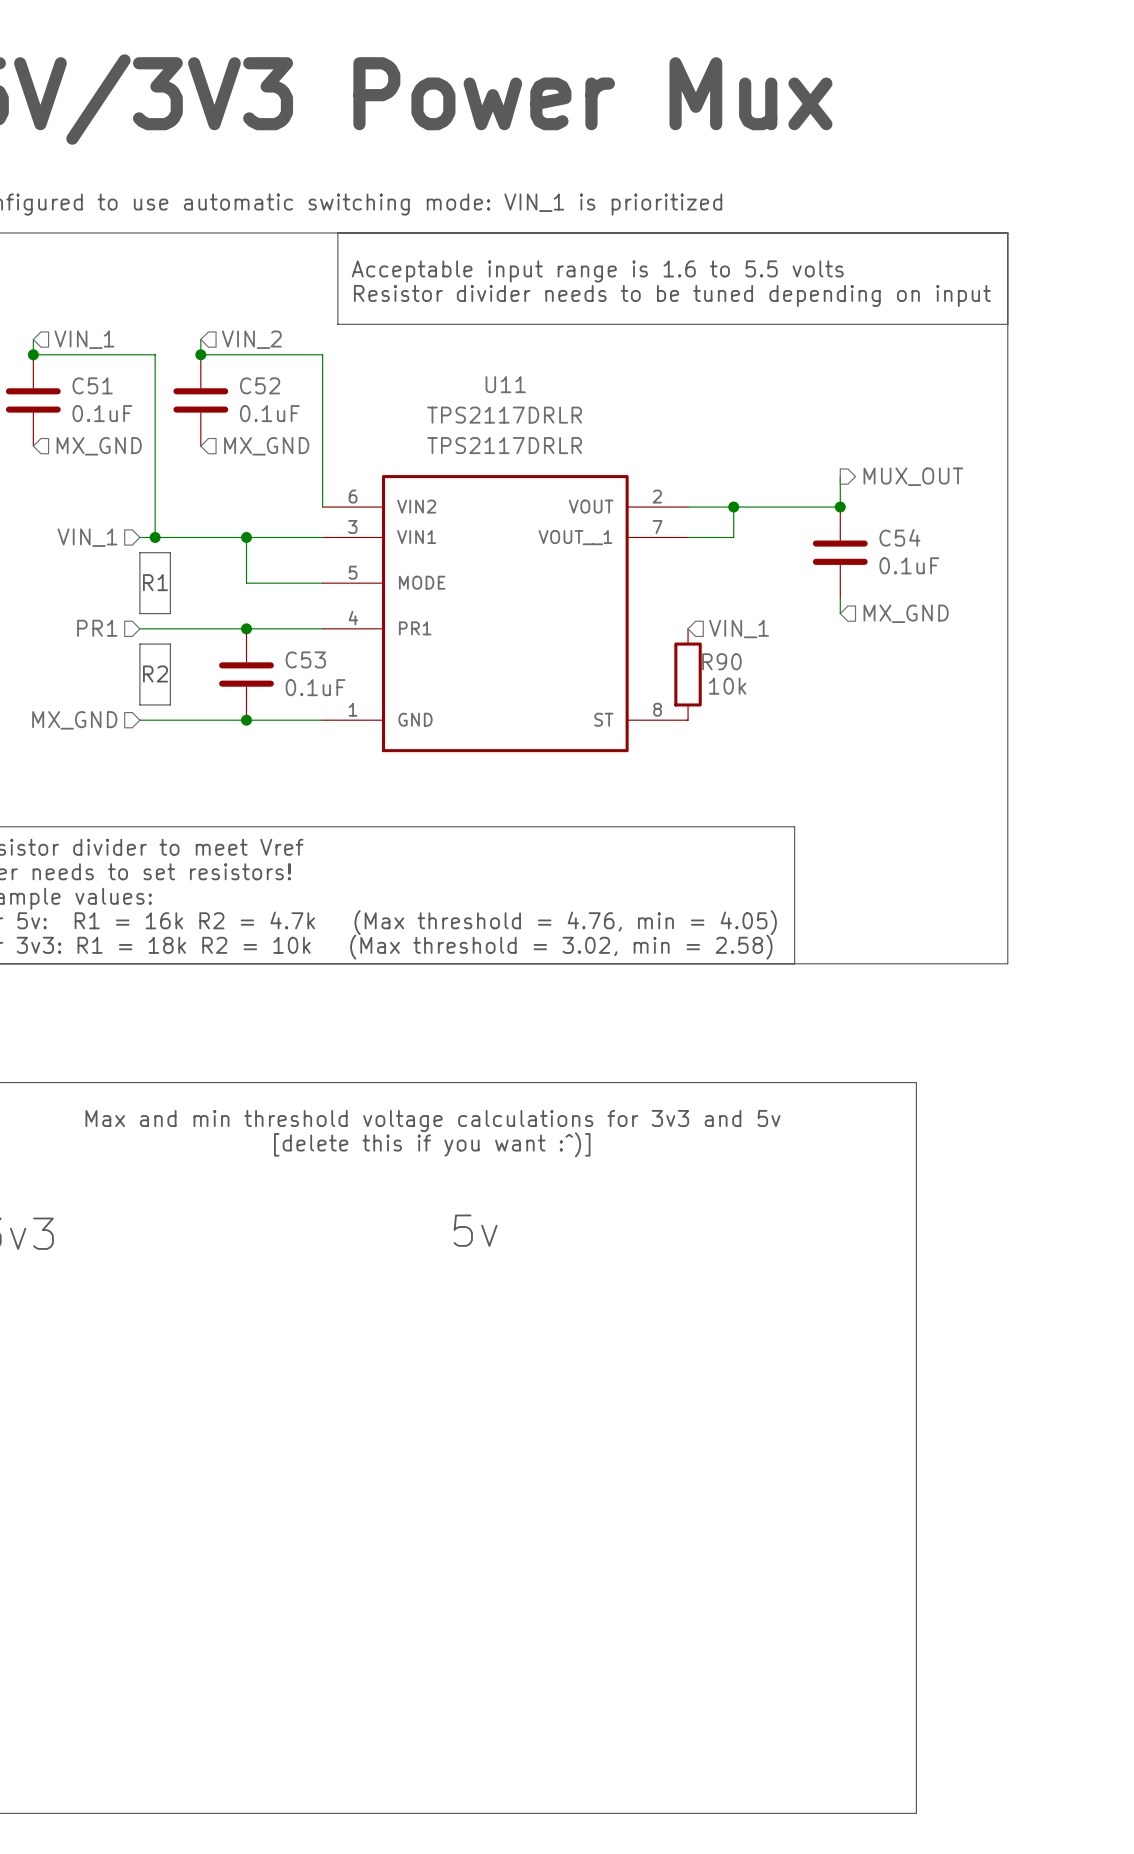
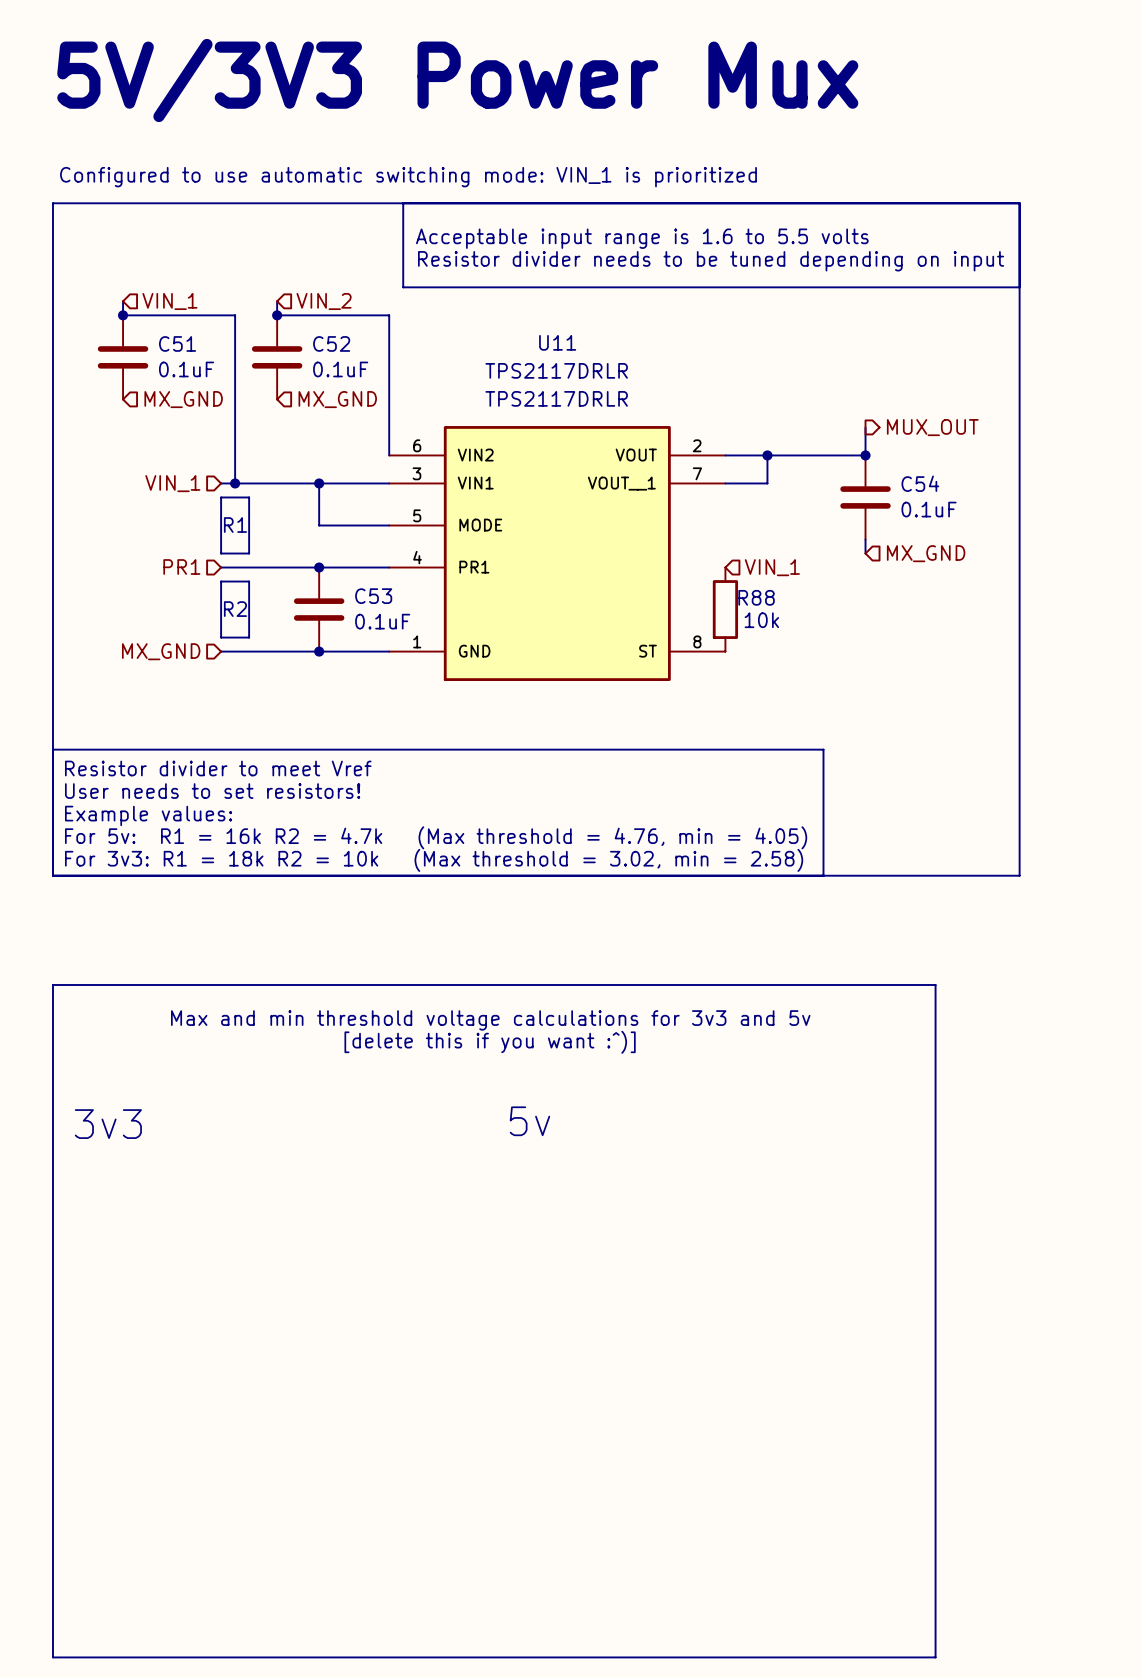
R90 name: R90 (721, 661) -> R88 (756, 597)

